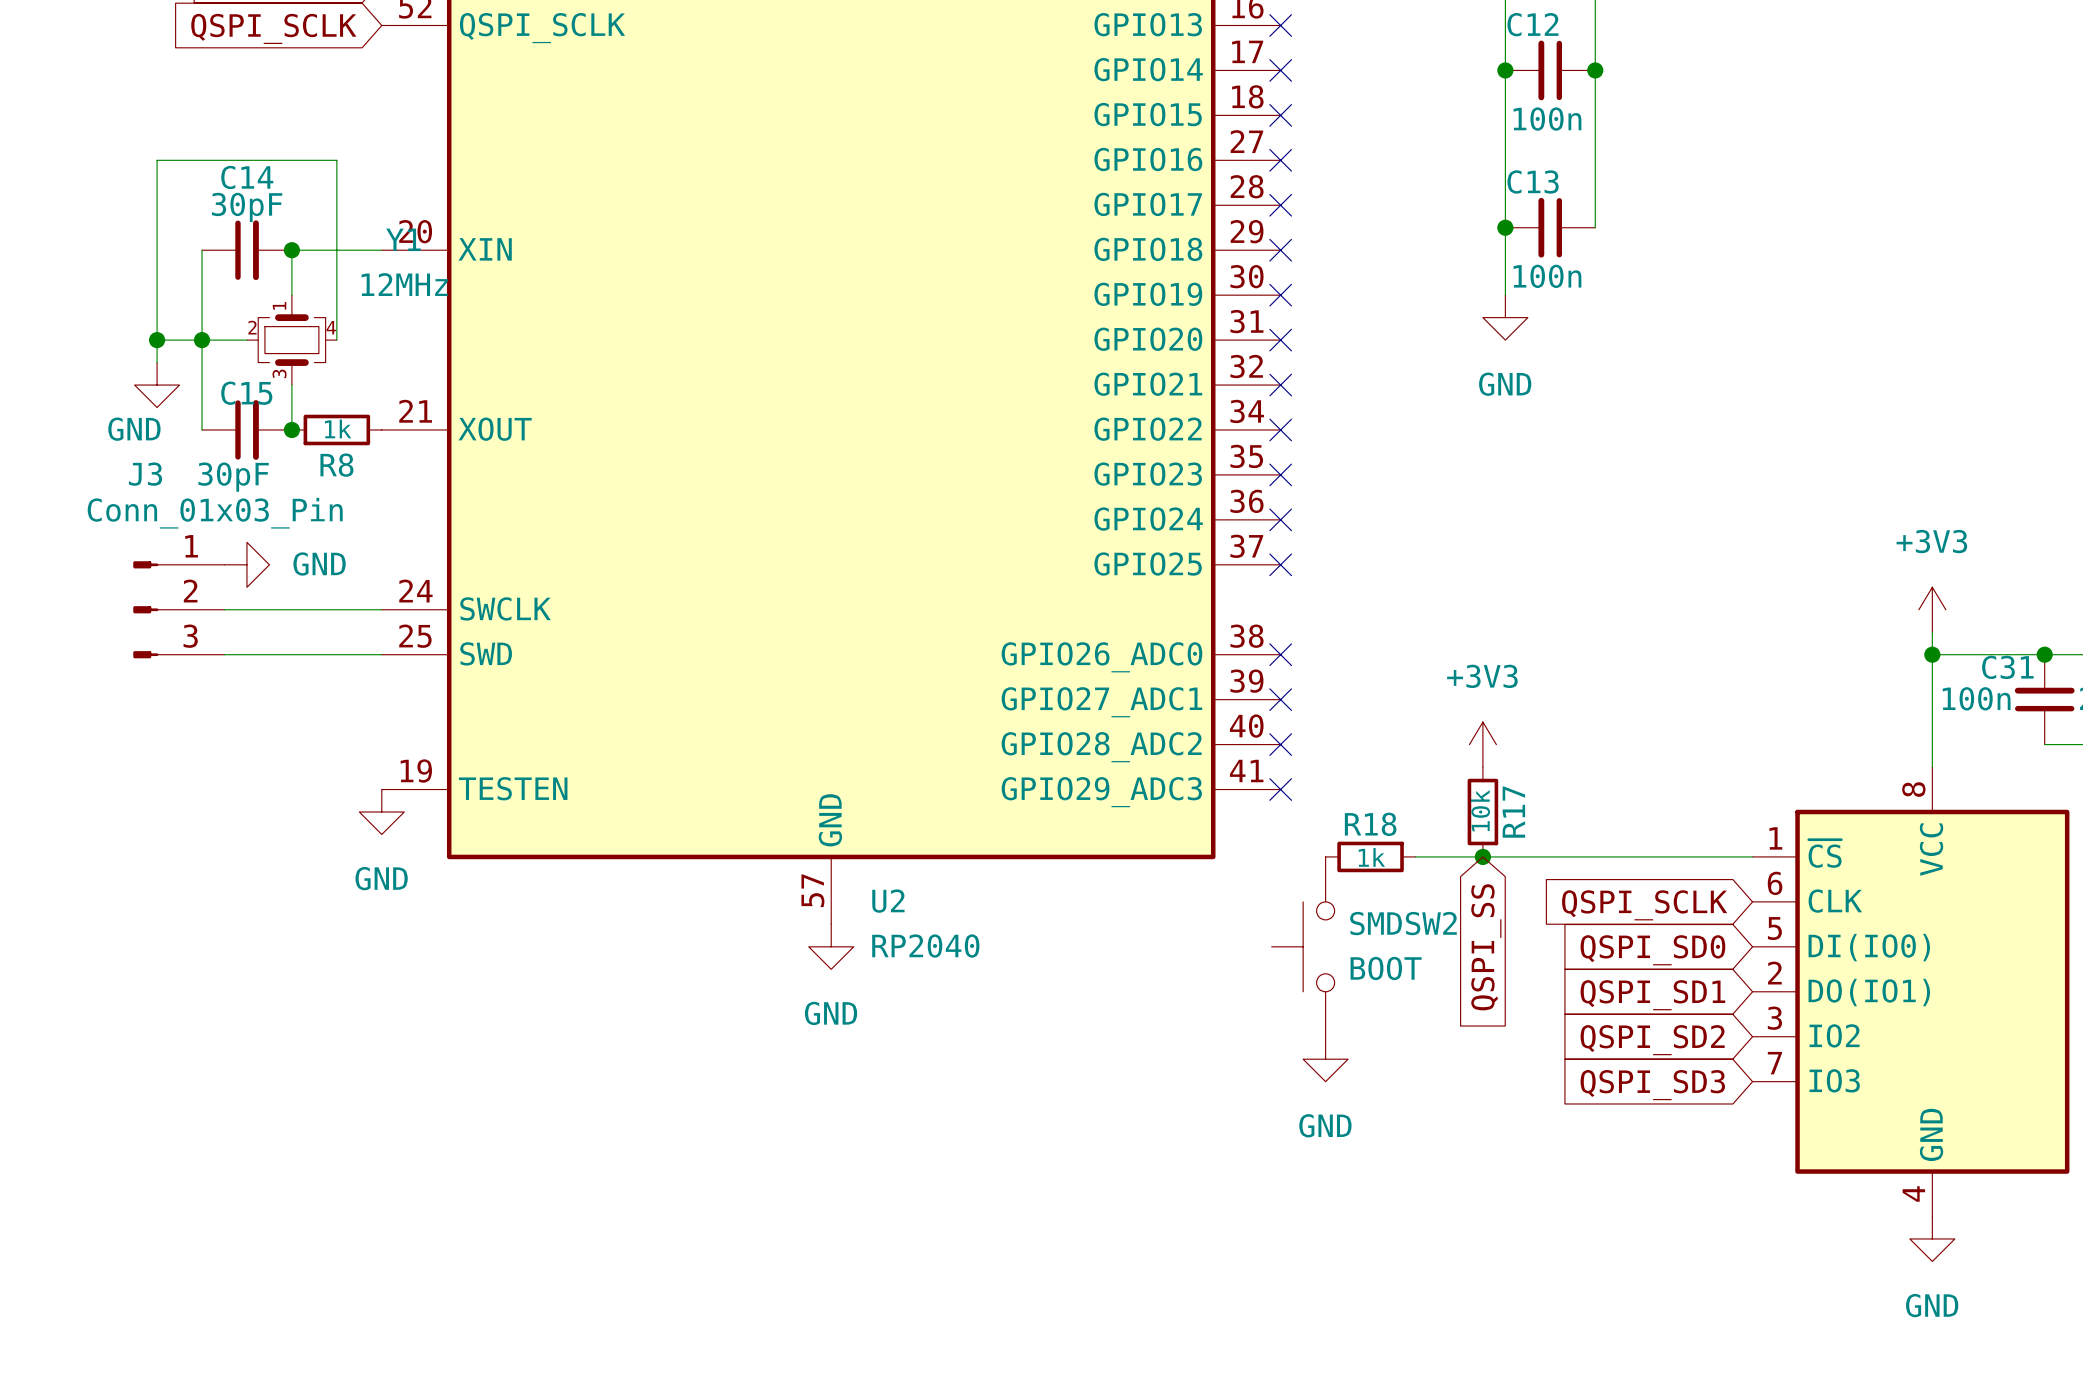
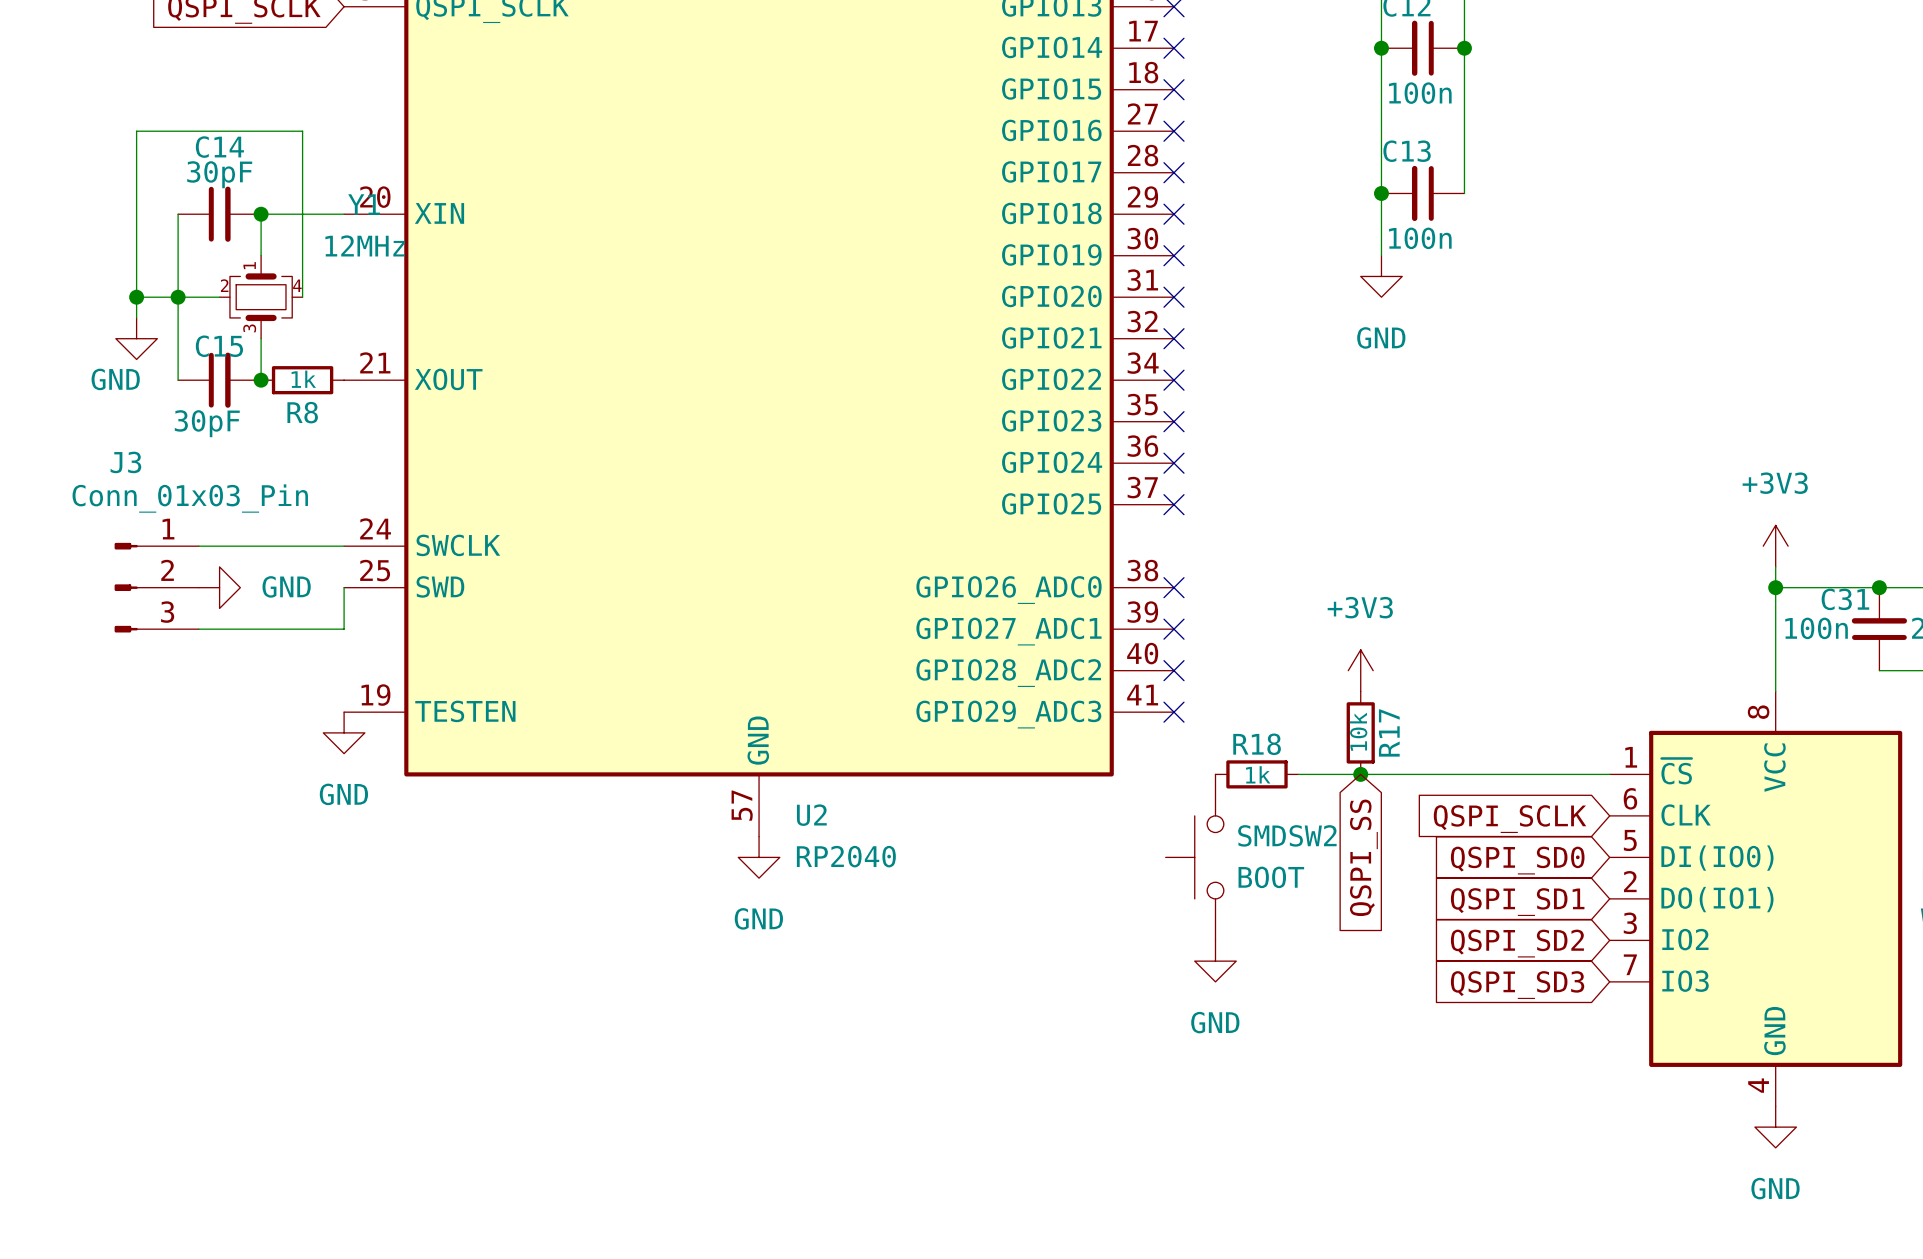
power symbol position: GND (246, 564) -> GND (219, 587)
J3 position: (178, 609) -> (156, 587)
wire: (224, 654) (381, 654) -> (198, 629) (344, 629) (344, 587)

